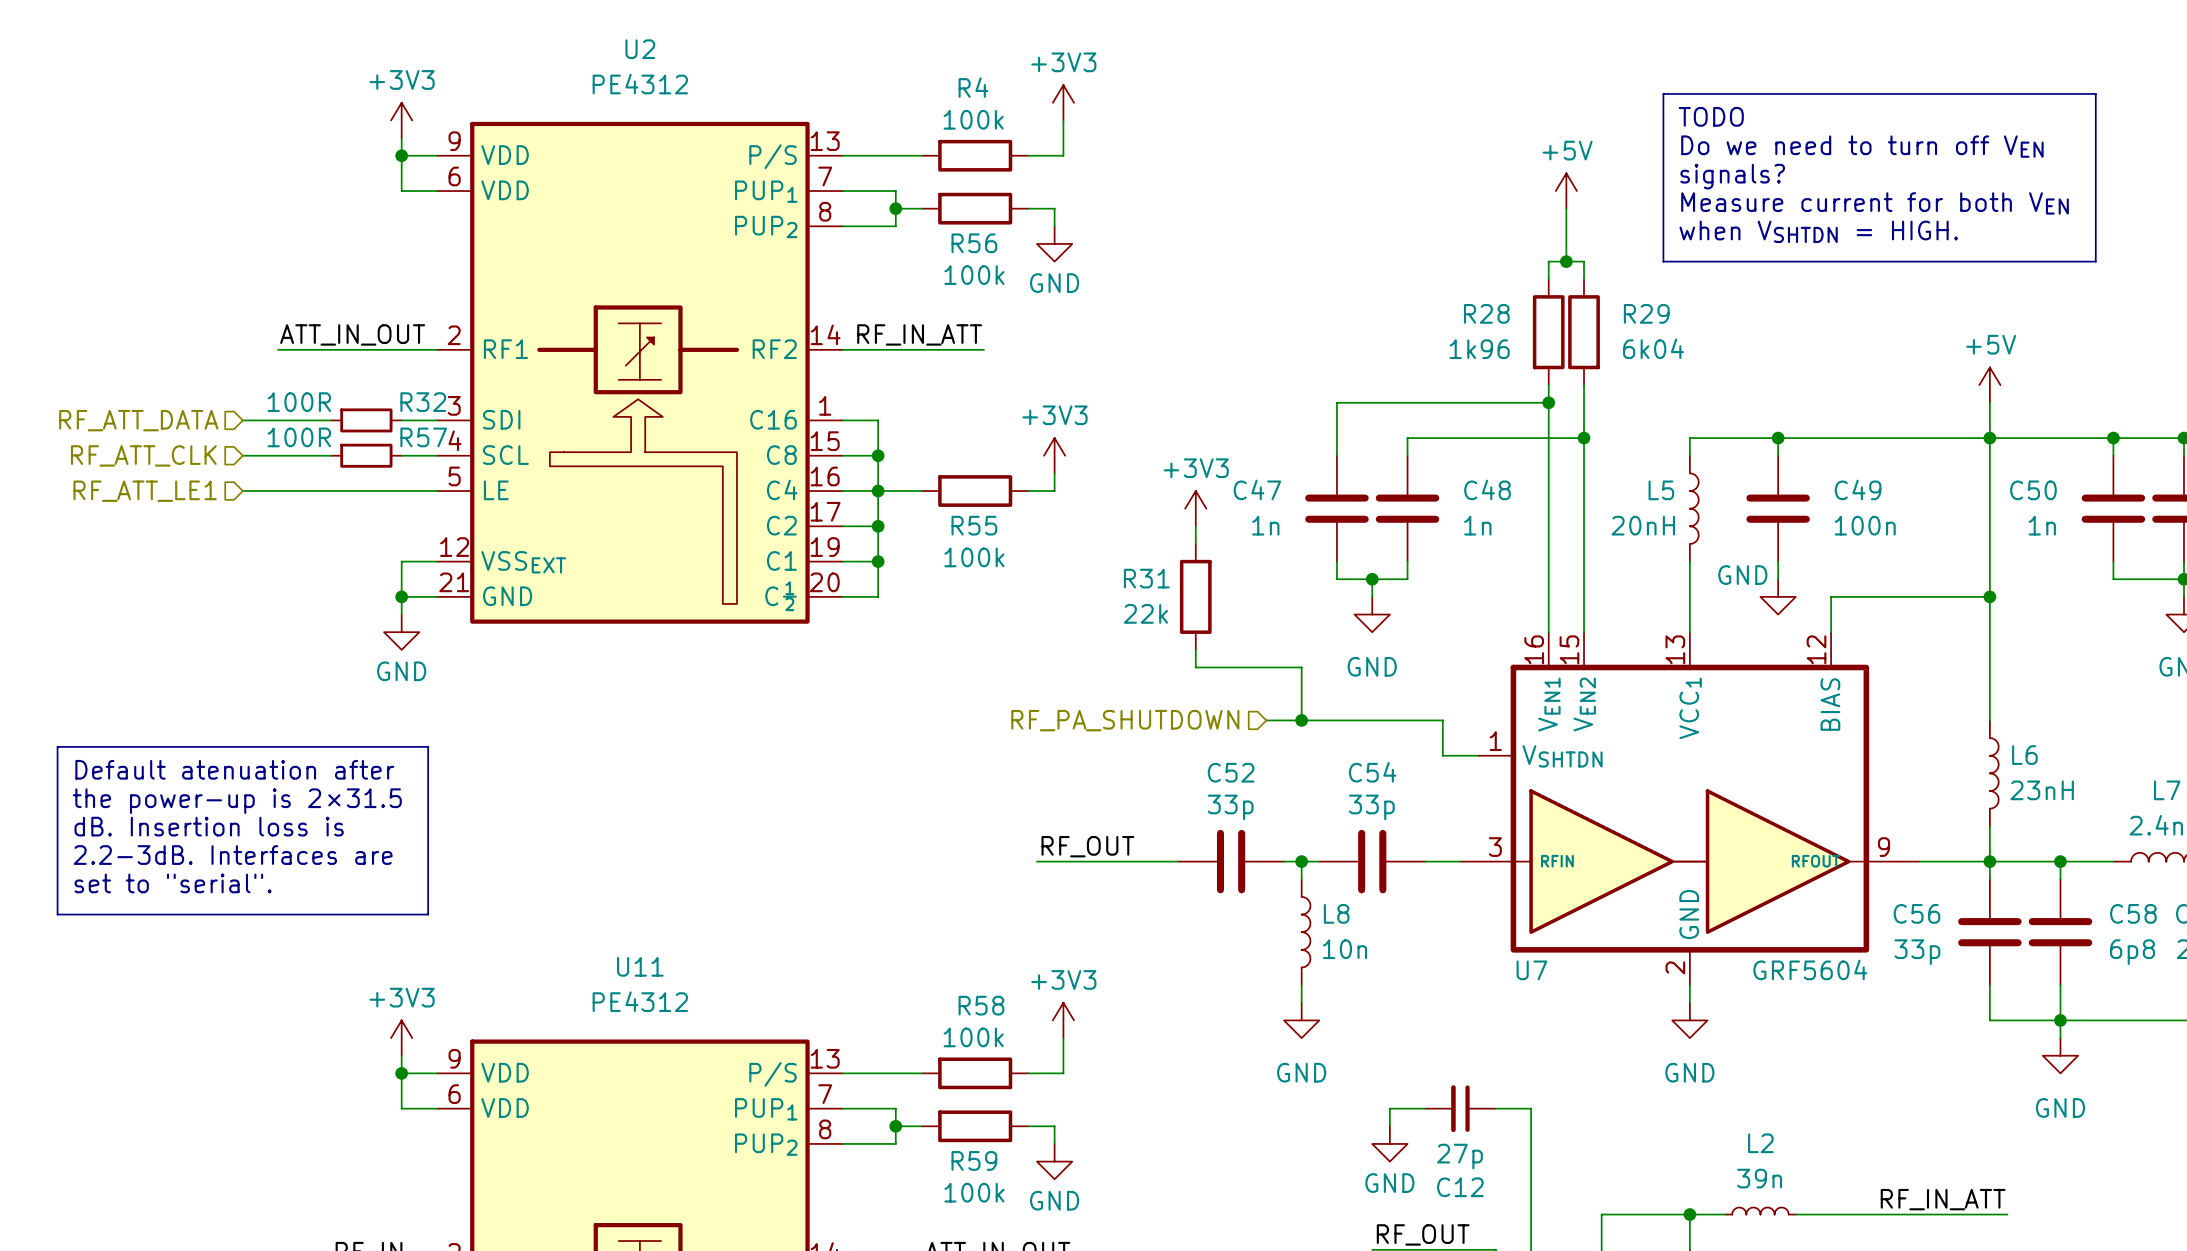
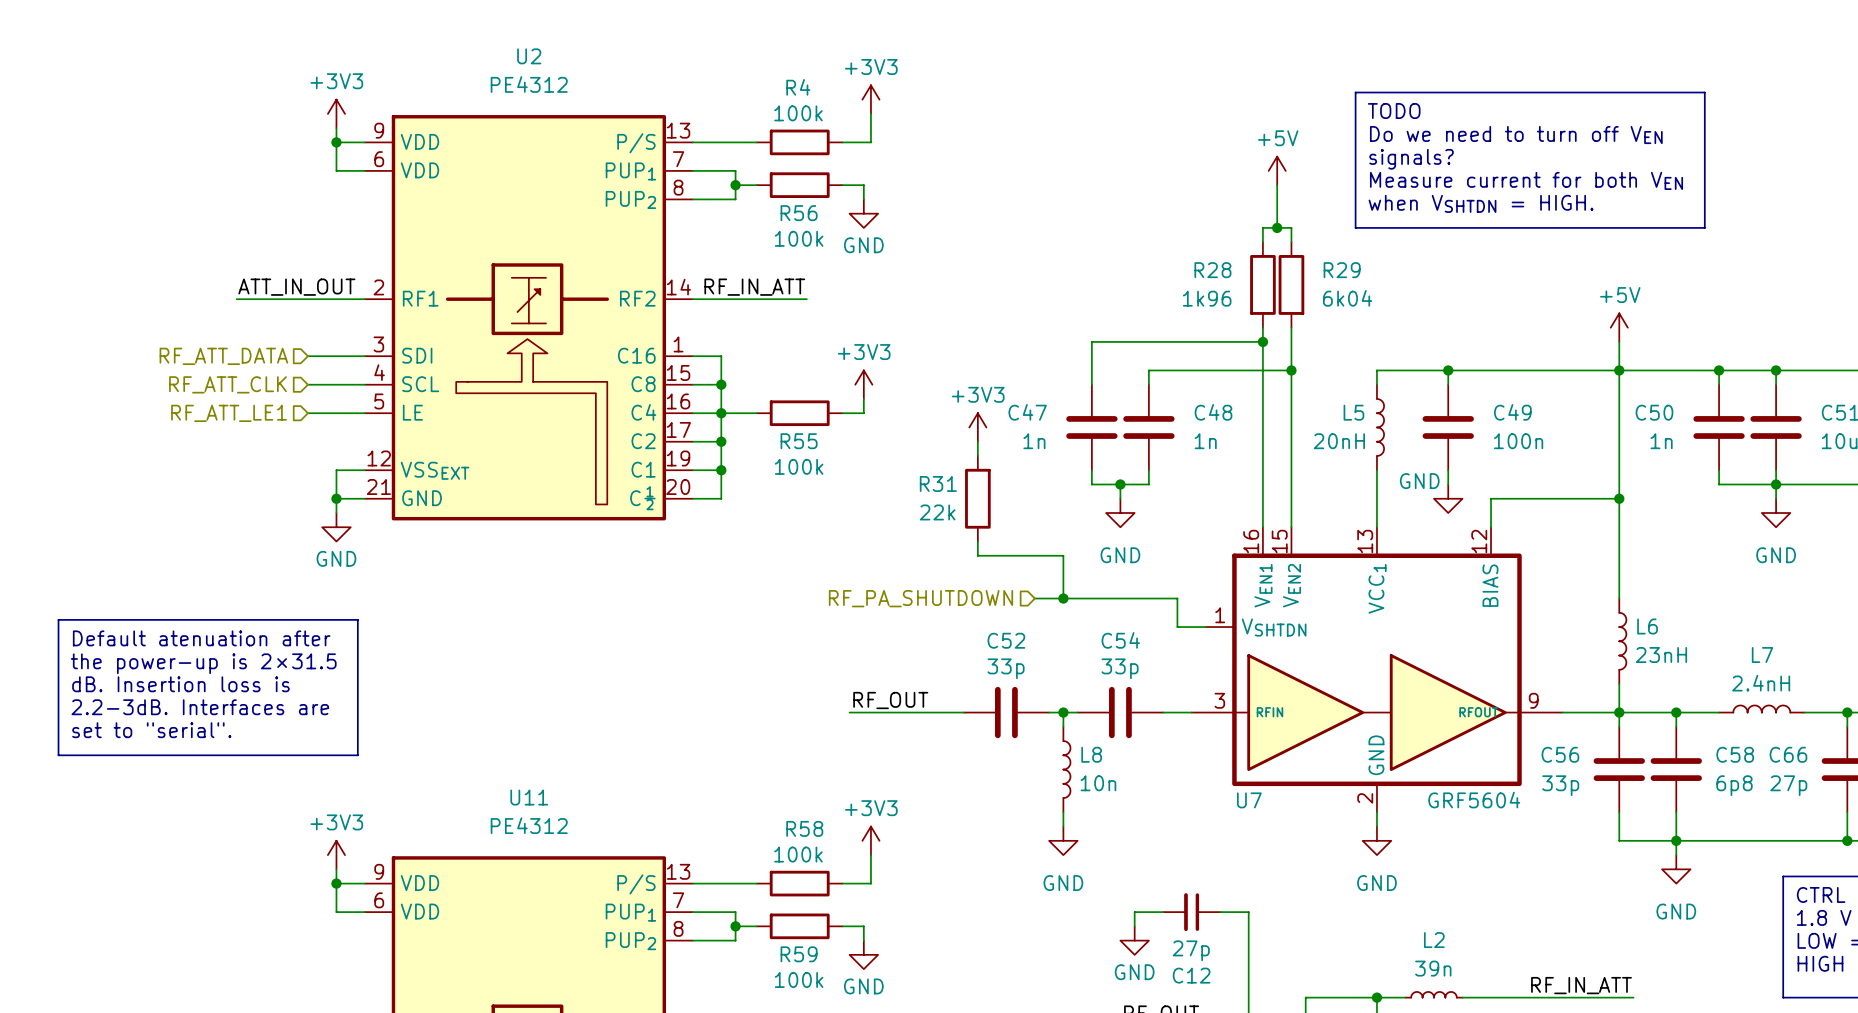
hierarchical label position: RF_ATT_DATA (138, 420) -> RF_ATT_DATA (223, 356)
wire: (242, 420) (331, 420) -> none
wire: none -> (307, 356) (336, 356)
R32: 100R (366, 420) -> none
hierarchical label position: RF_ATT_CLK (143, 455) -> RF_ATT_CLK (227, 384)
wire: (242, 455) (331, 455) -> none
wire: none -> (307, 384) (336, 384)
R57: 100R (366, 455) -> none
hierarchical label position: RF_ATT_LE1 (145, 491) -> RF_ATT_LE1 (229, 413)
wire: (242, 491) (366, 491) -> none

